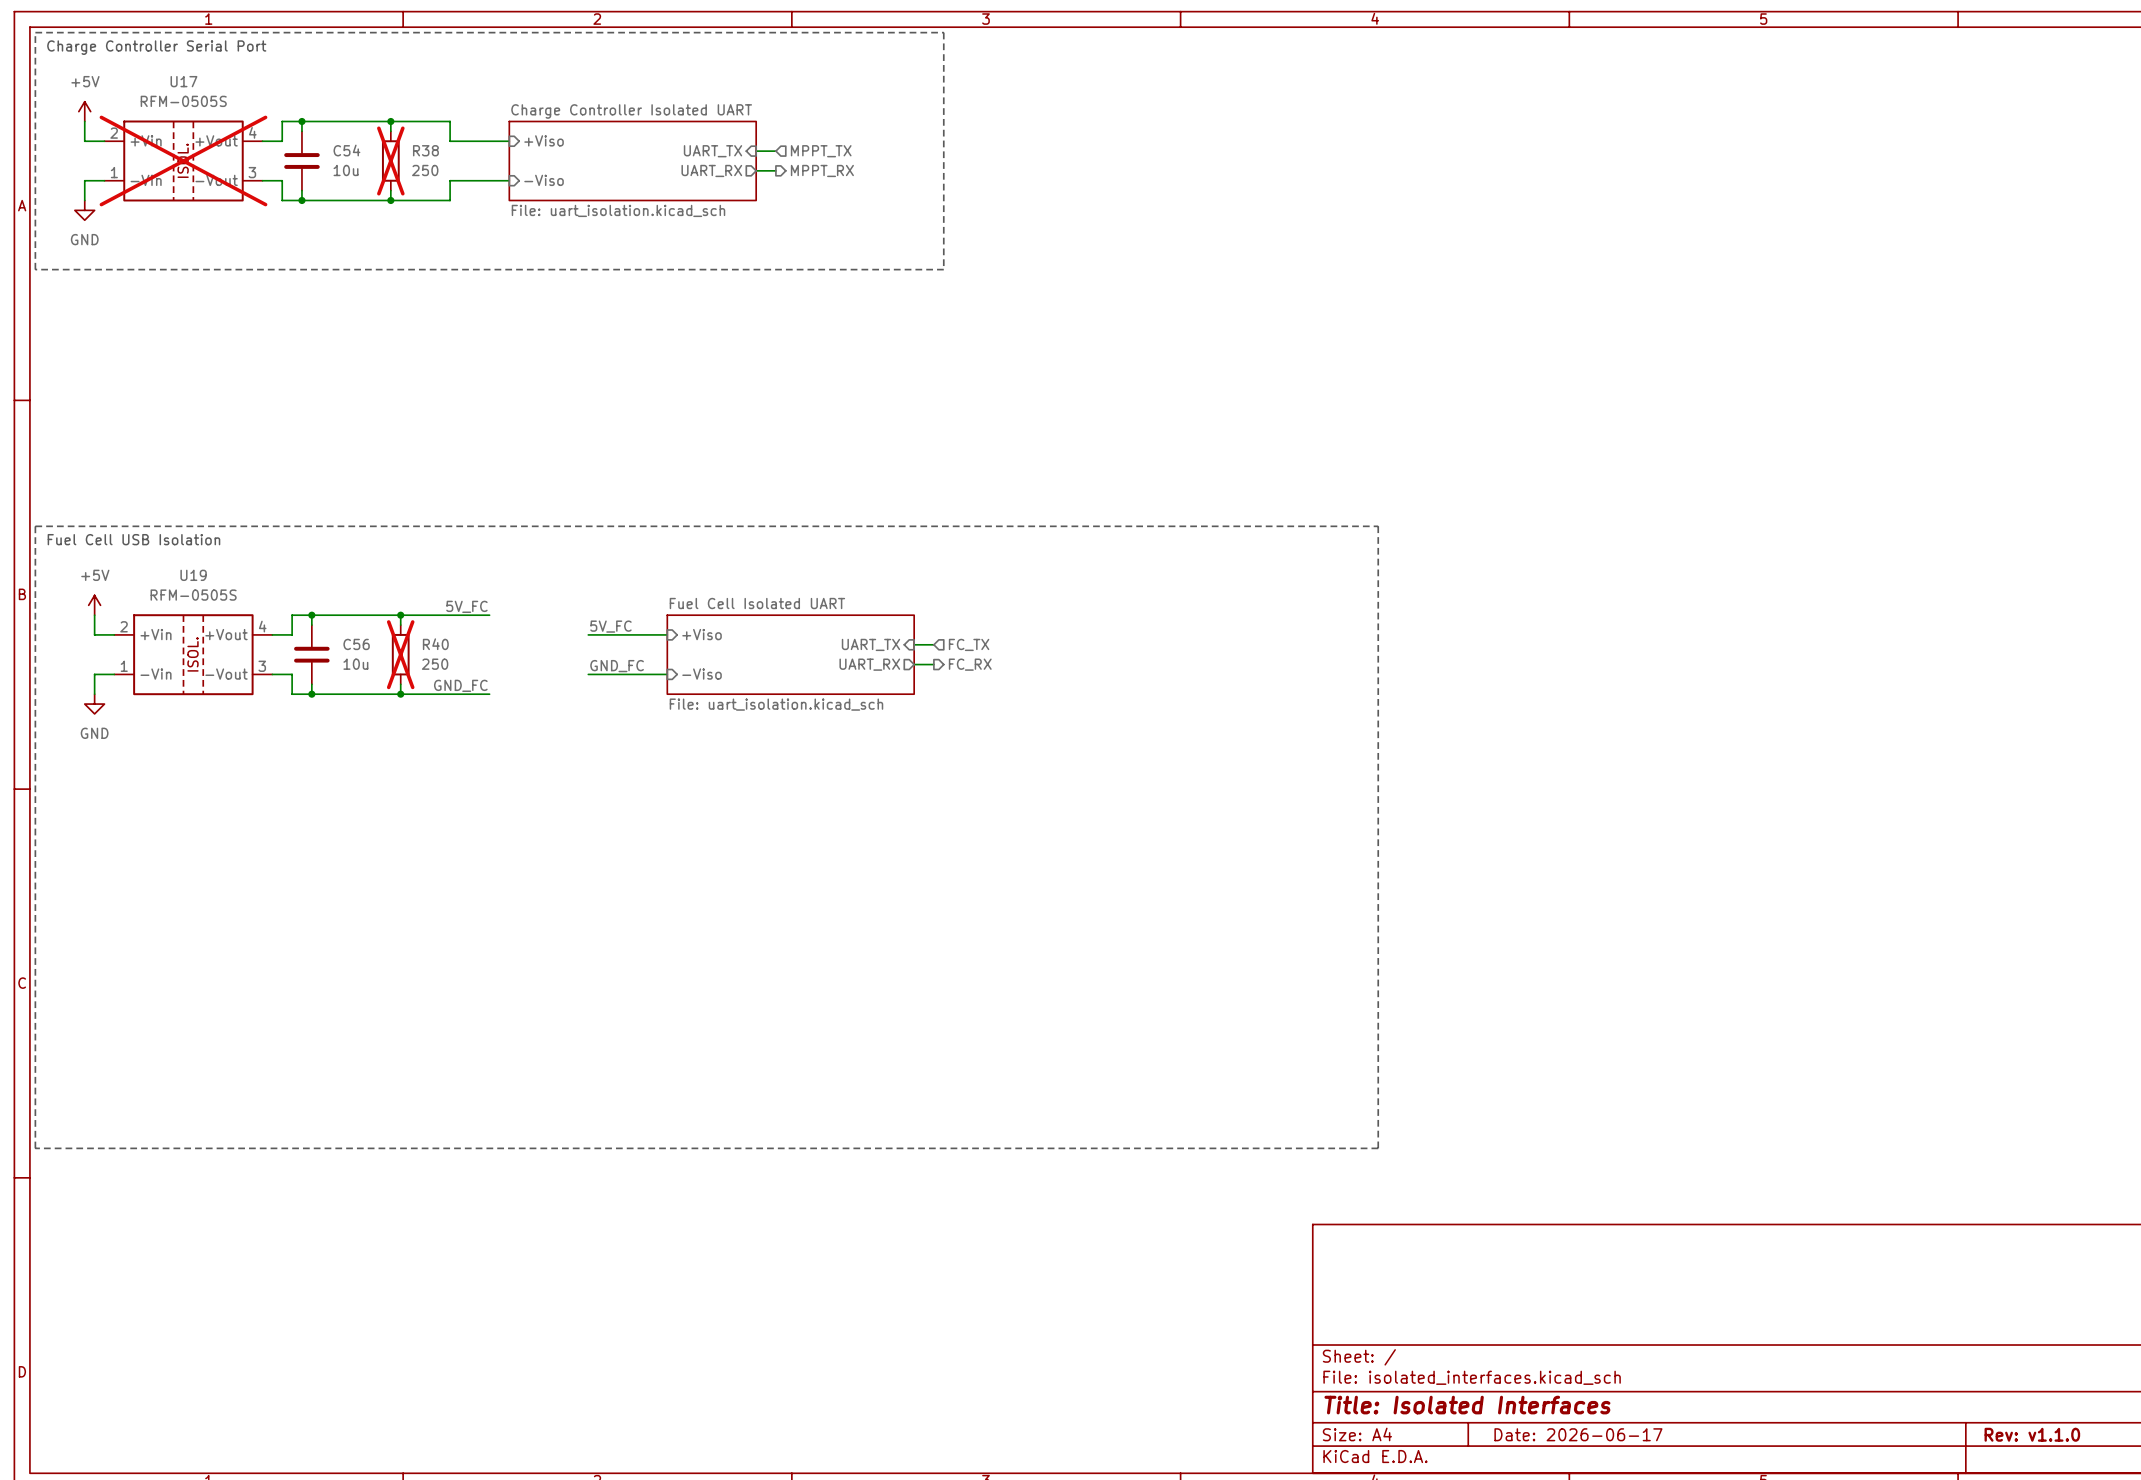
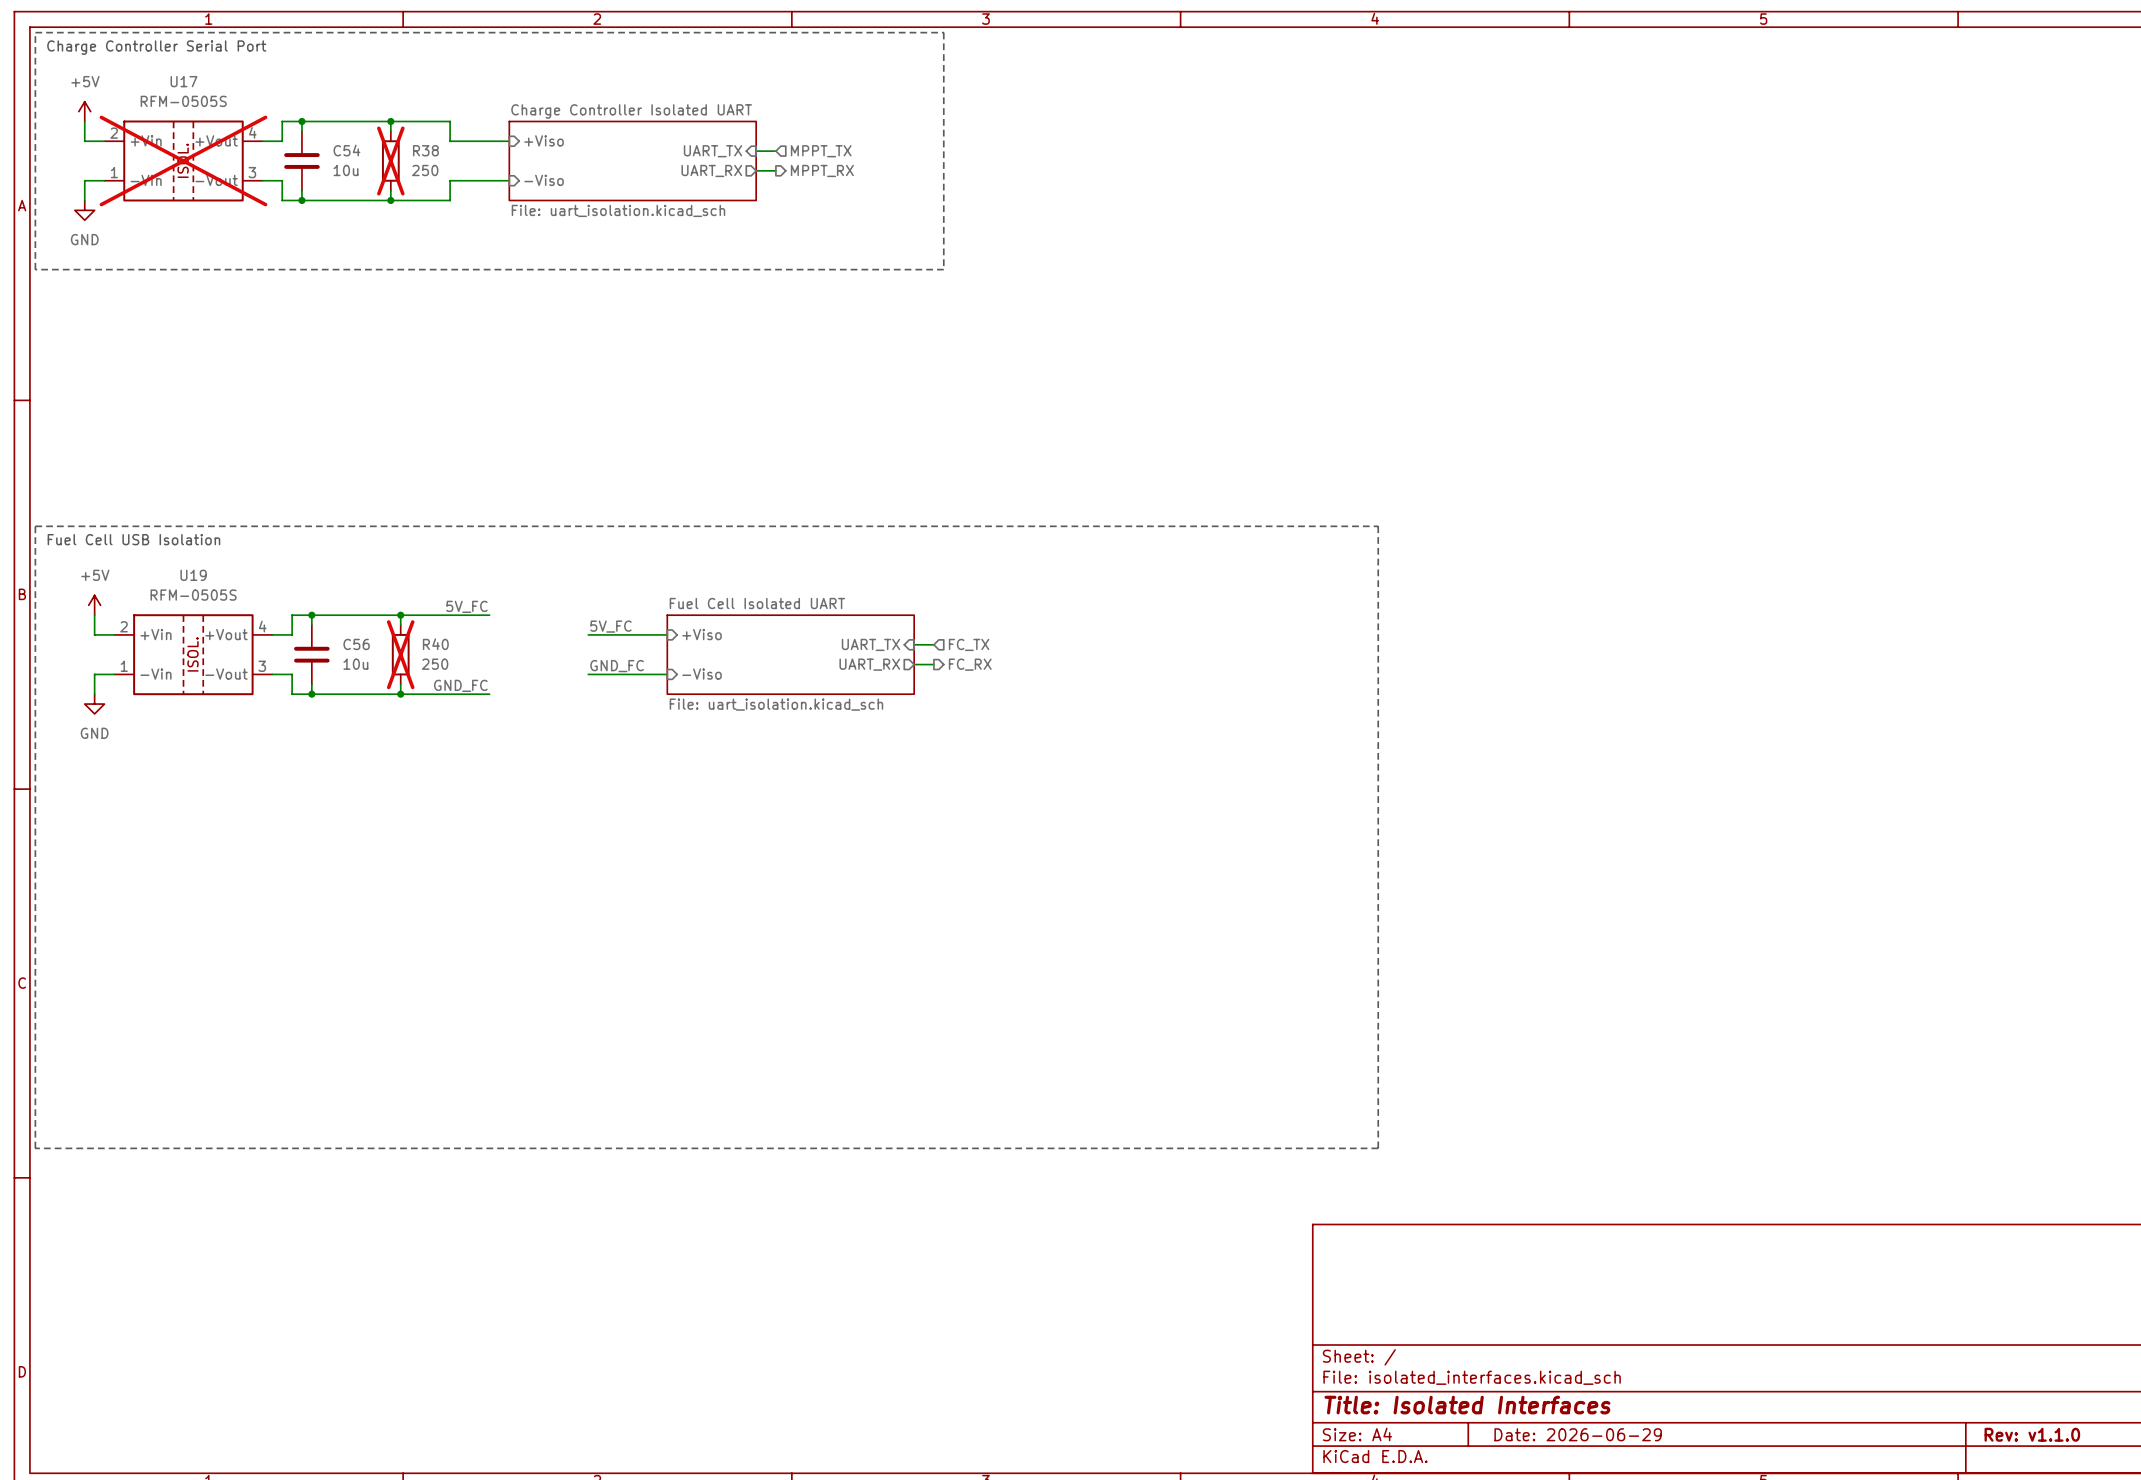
title block: Date: 2026-06-17 (1578, 1434) -> Date: 2026-06-29 (1578, 1434)

